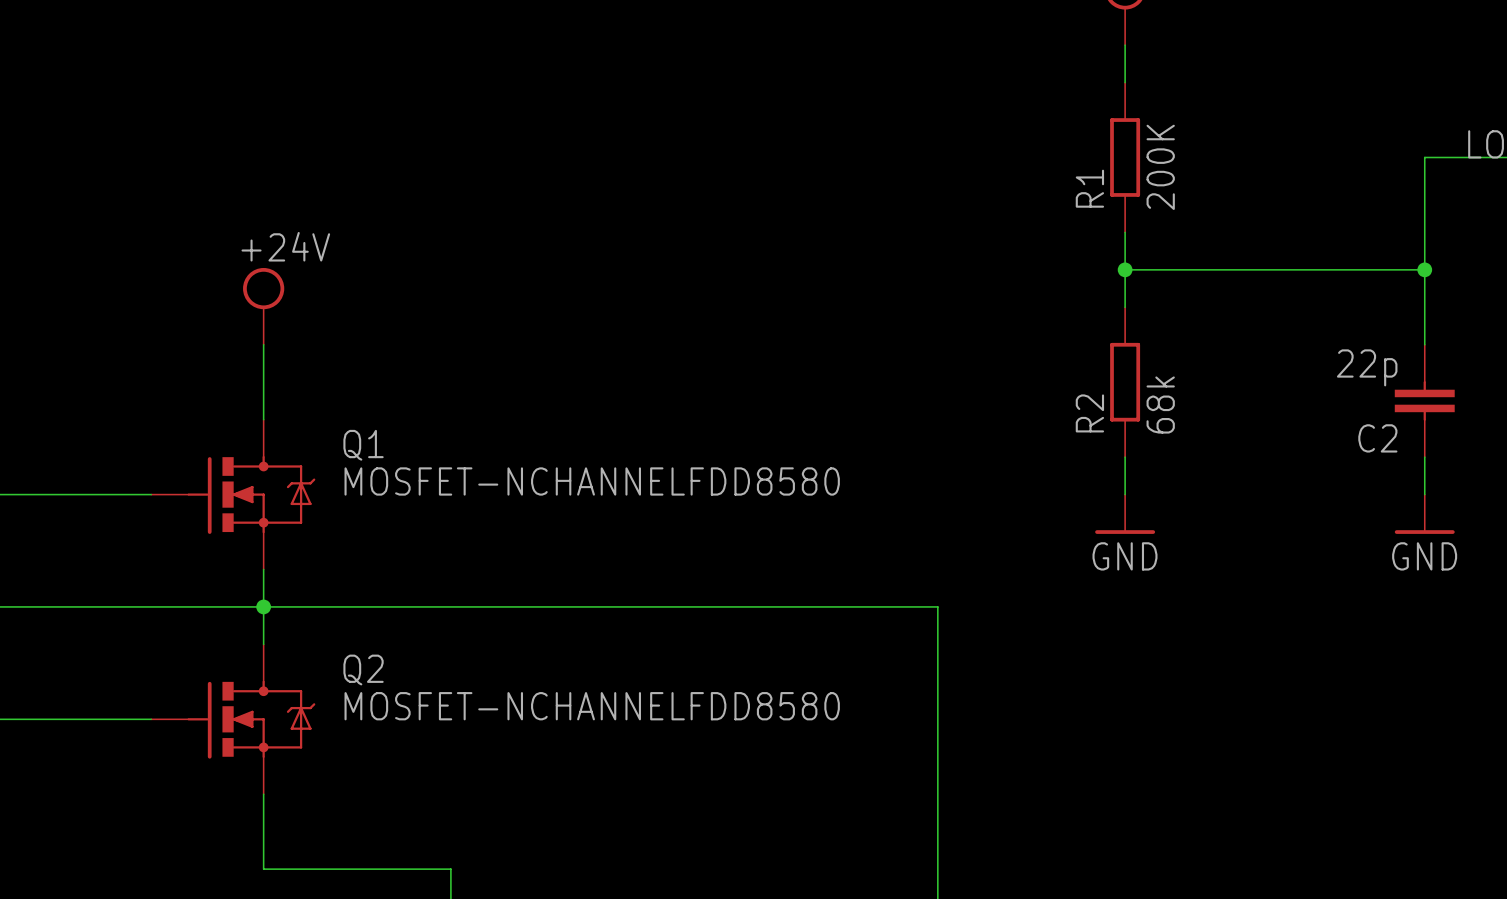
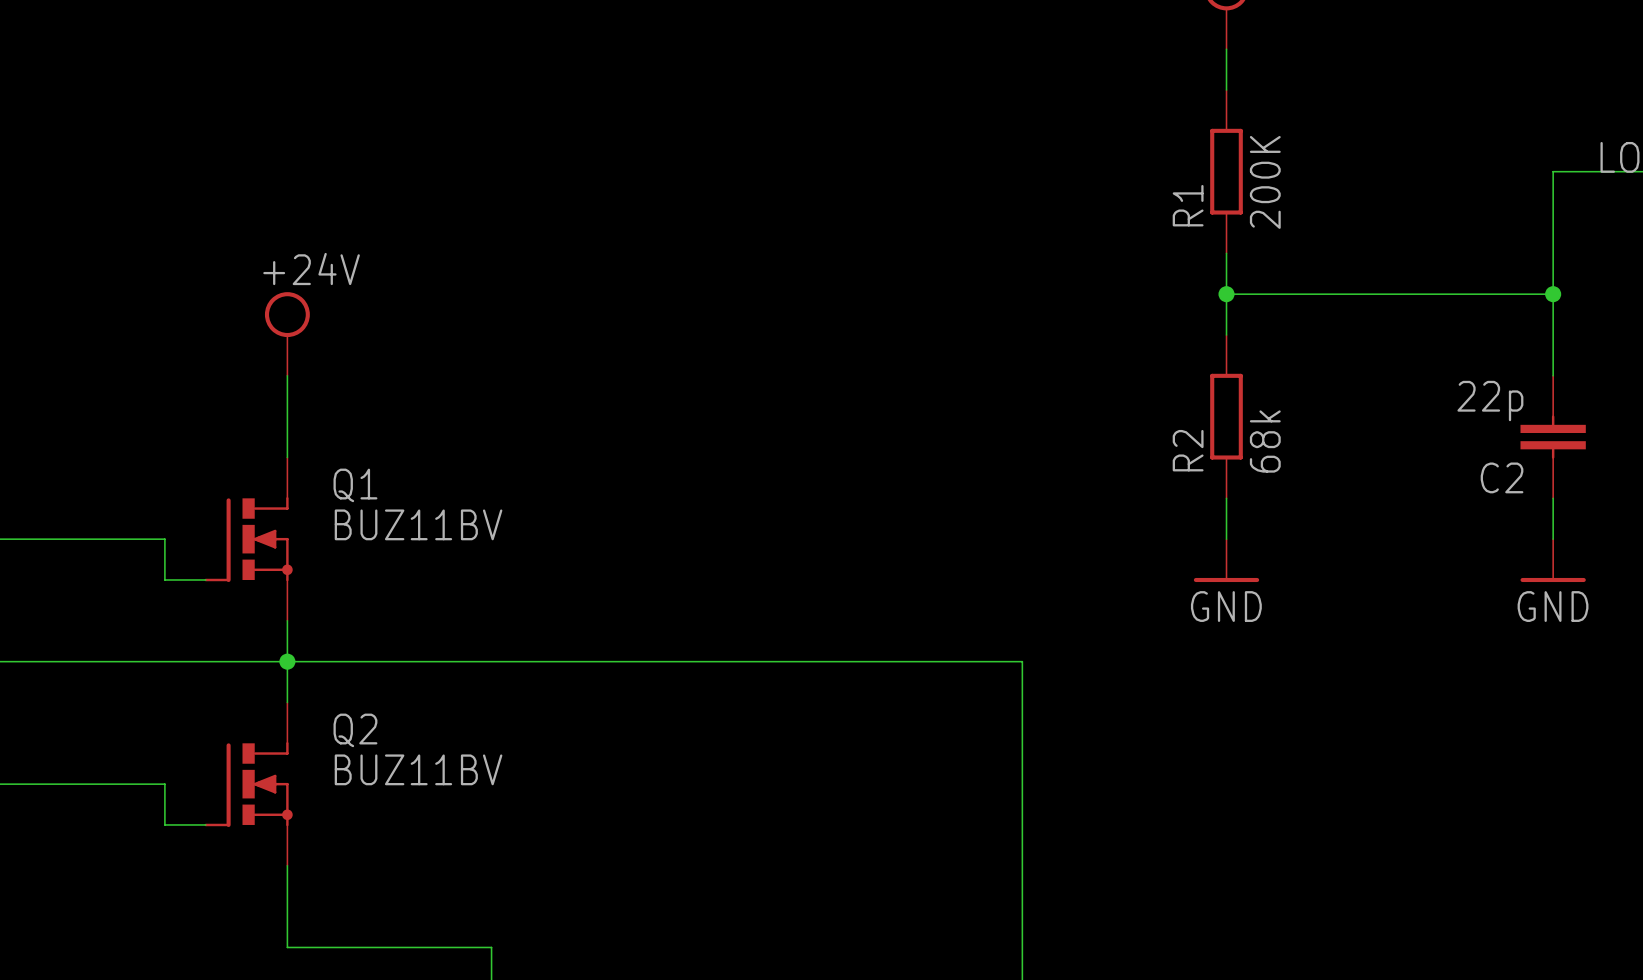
Q1 symbol: [151, 419, 316, 570] -> [204, 457, 293, 621]
Q1 name position: Q1 (363, 445) -> Q1 (355, 485)
Q1 value: MOSFET-NCHANNELFDD8580 (592, 481) -> BUZ11BV (418, 524)
wire: none -> (164, 539) (164, 579) (205, 579)
Q2 symbol: [151, 644, 316, 795] -> [204, 702, 293, 866]
Q2 name position: Q2 (363, 670) -> Q2 (355, 730)
Q2 value: MOSFET-NCHANNELFDD8580 (592, 706) -> BUZ11BV (418, 769)
wire: none -> (164, 784) (164, 824) (205, 824)

